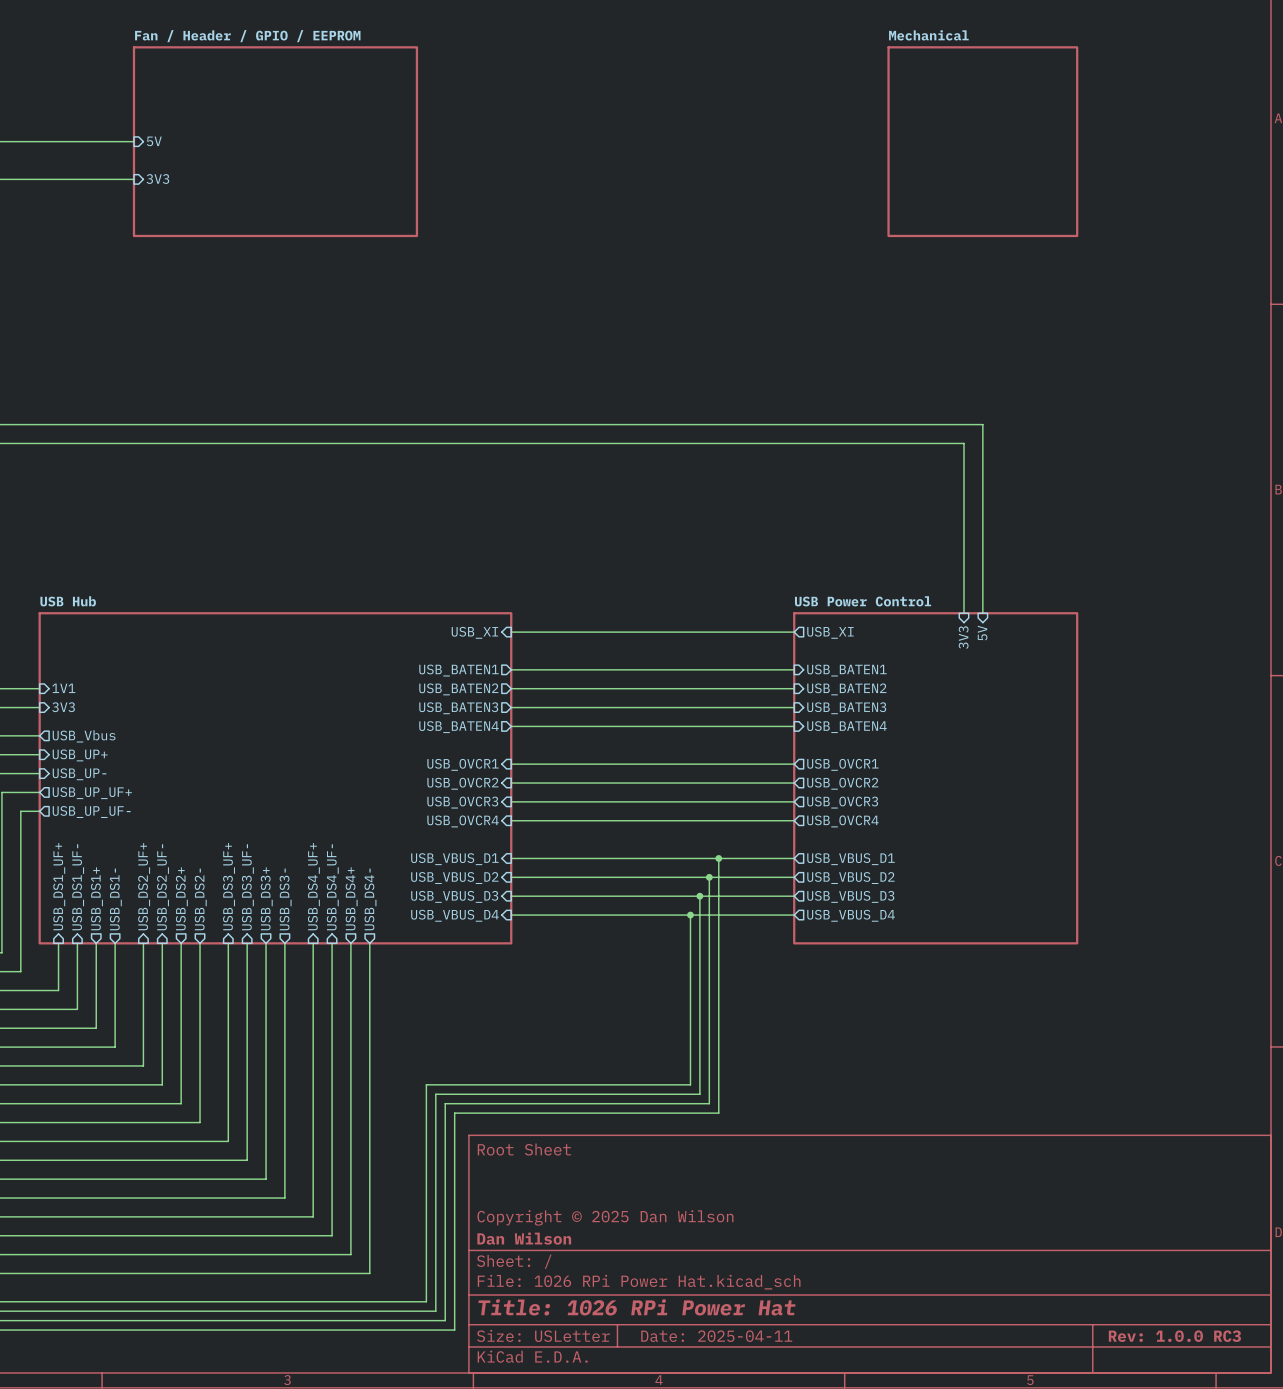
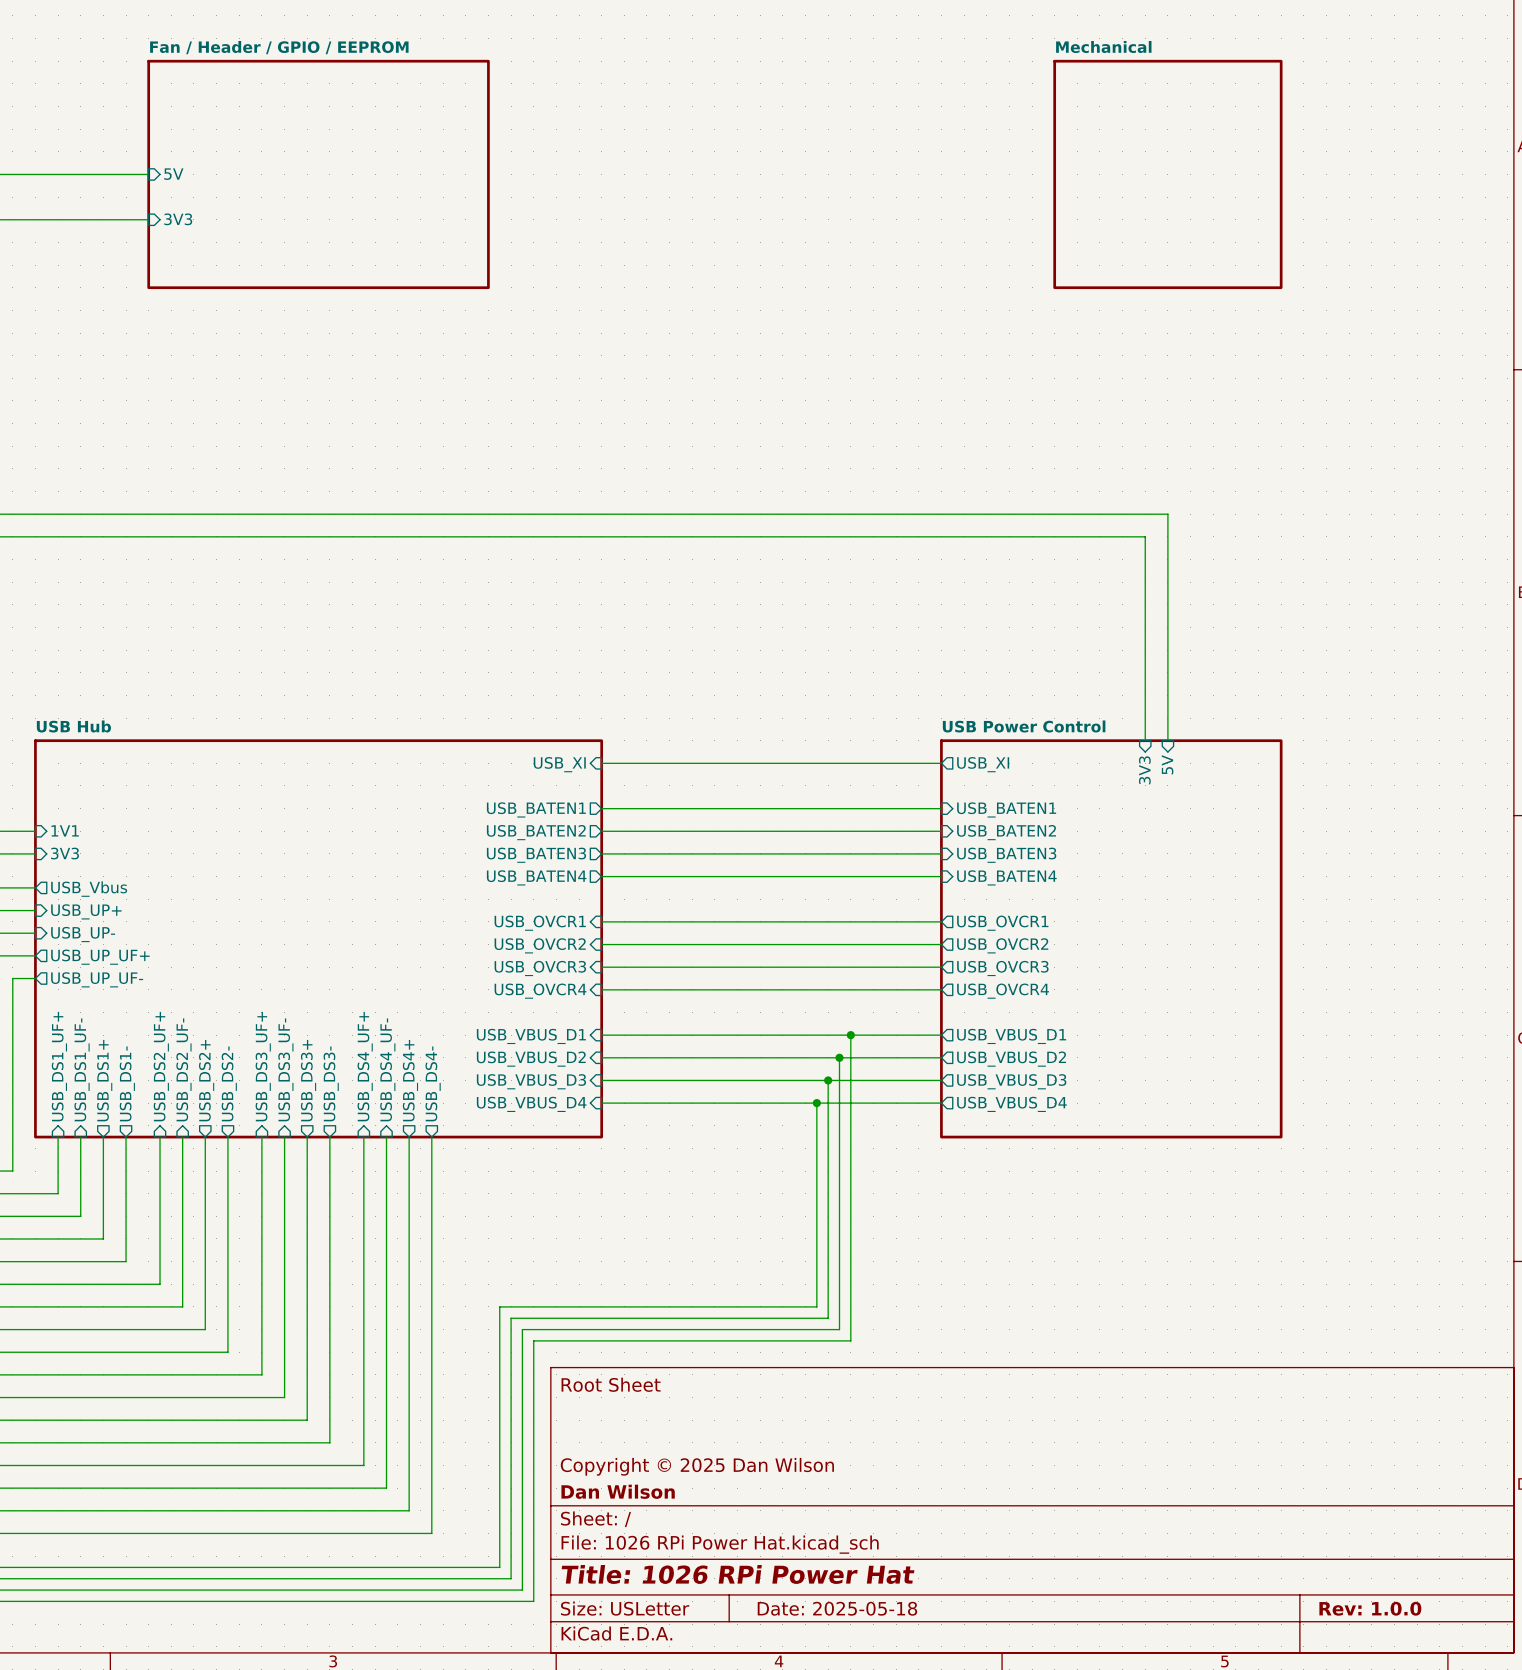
title block: Date: 2025-04-11 (716, 1336) -> Date: 2025-05-18 (837, 1608)
title block: Rev: 1.0.0 RC3 (1174, 1336) -> Rev: 1.0.0 (1370, 1608)

